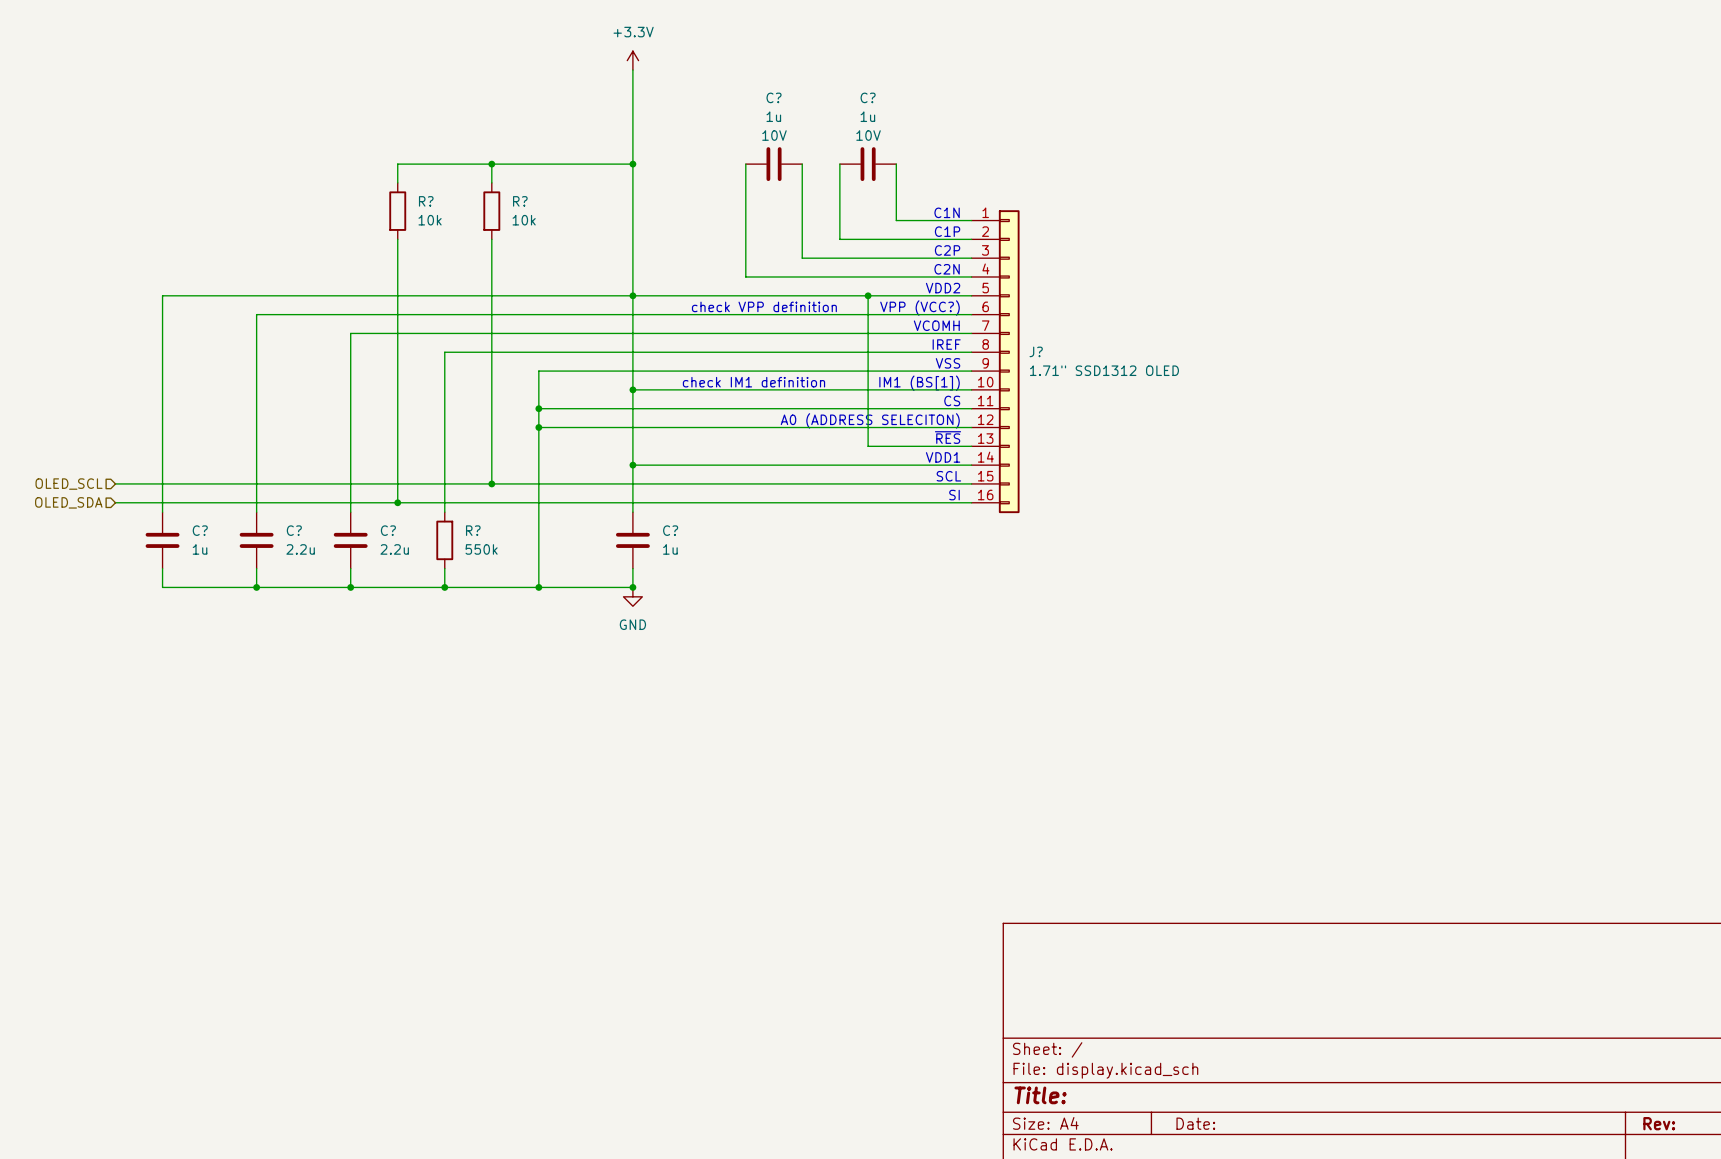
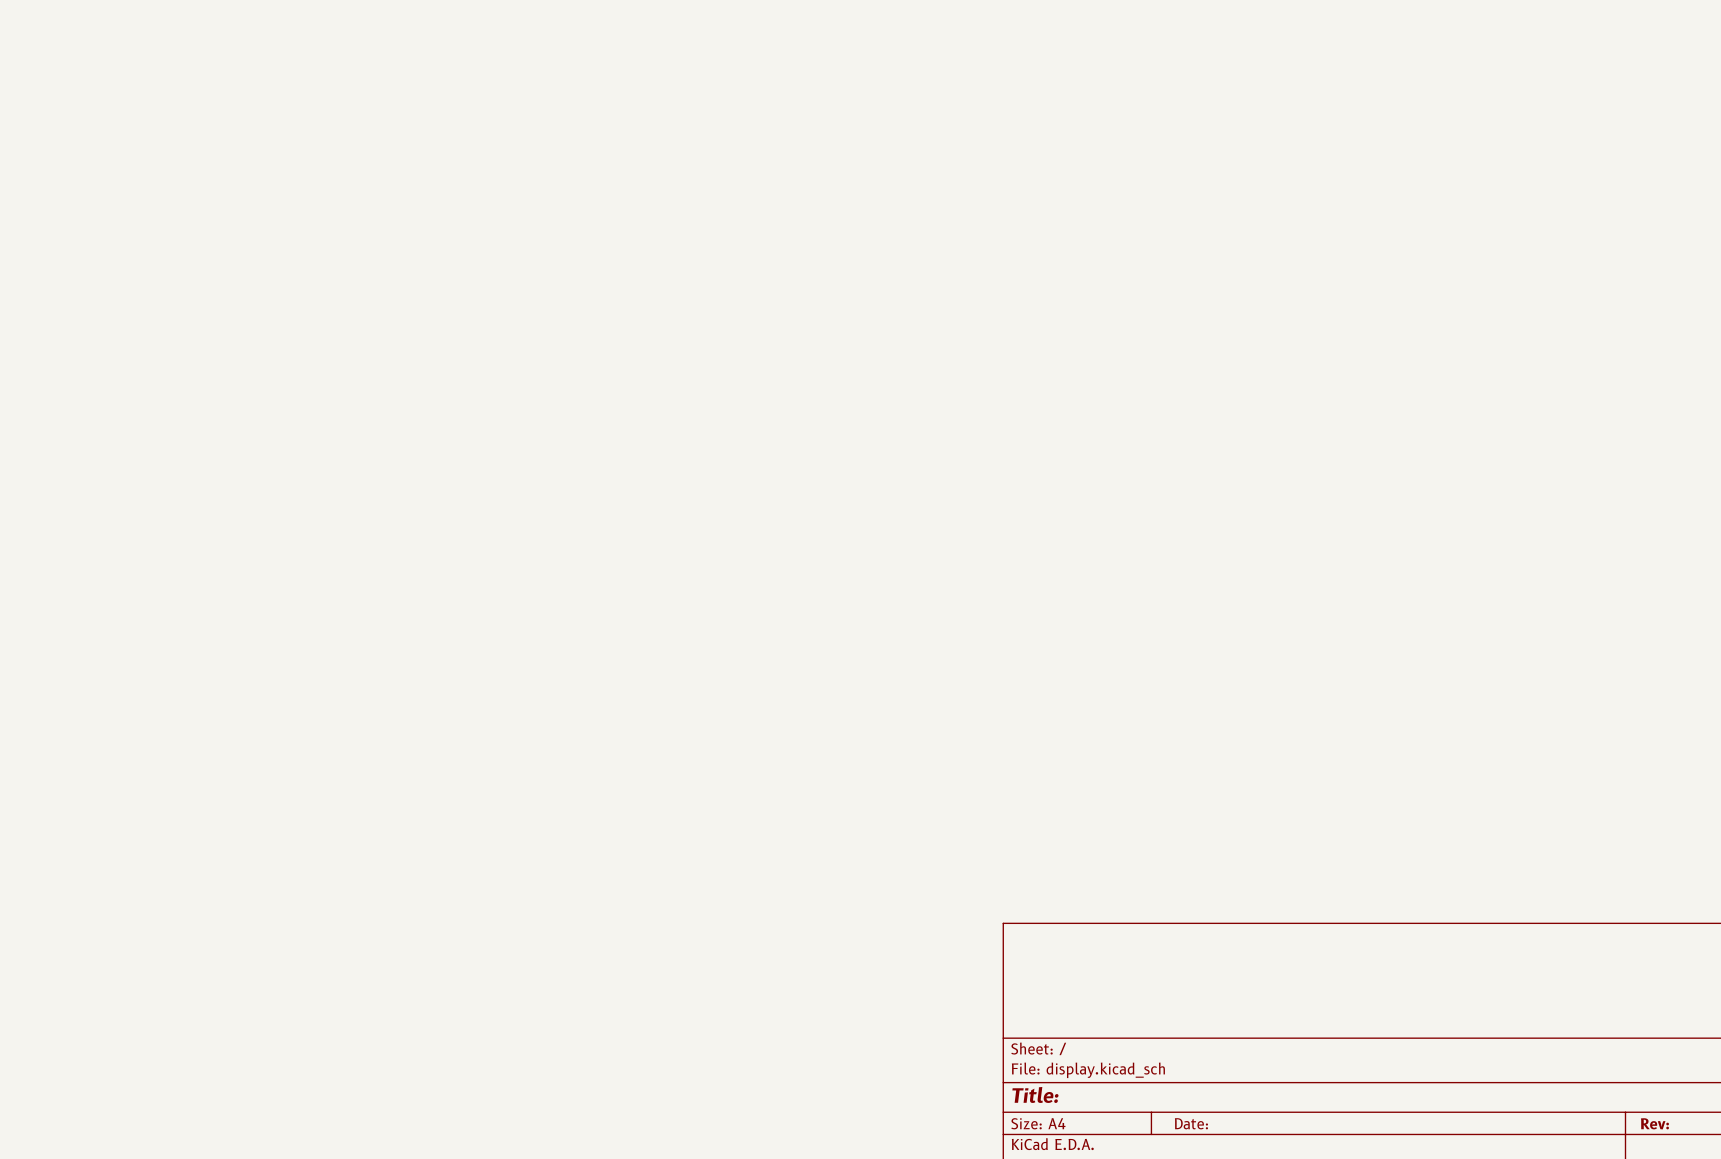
power symbol: +3.3V (632, 60) -> none
wire: (632, 70) (632, 512) -> none
wire: (491, 164) (491, 182) -> none
junction: (491, 164) -> none
wire: (632, 164) (397, 164) (397, 182) -> none
junction: (632, 164) -> none
wire: (745, 164) (745, 276) (971, 276) -> none
C?: 1u (774, 164) -> none
wire: (802, 164) (802, 258) (971, 258) -> none
wire: (839, 164) (839, 239) (971, 239) -> none
C?: 1u (868, 164) -> none
wire: (896, 164) (896, 220) (971, 220) -> none
R?: 10k (397, 211) -> none
R?: 10k (491, 211) -> none
text: C1N (947, 212) -> none
text: C1P (947, 231) -> none
wire: (397, 239) (397, 502) -> none
wire: (491, 239) (491, 483) -> none
text: C2P (947, 250) -> none
text: C2N (947, 269) -> none
text: VDD2 (943, 288) -> none
junction: (632, 295) -> none
wire: (868, 295) (868, 446) (971, 446) -> none
junction: (868, 295) -> none
wire: (971, 295) (162, 295) (162, 512) -> none
text: check VPP definition (764, 306) -> none
text: VPP (VCC?) (919, 308) -> none
wire: (971, 314) (256, 314) (256, 512) -> none
text: VCOMH (936, 325) -> none
wire: (971, 333) (350, 333) (350, 512) -> none
text: IREF (946, 344) -> none
wire: (971, 352) (444, 352) (444, 512) -> none
J?: 1.71" SSD1312 OLED (995, 361) -> none
text: VSS (947, 363) -> none
wire: (971, 371) (538, 371) (538, 587) -> none
text: check IM1 definition (753, 382) -> none
text: IM1 (BS[1]) (919, 383) -> none
wire: (632, 389) (971, 389) -> none
junction: (632, 389) -> none
text: CS (952, 400) -> none
wire: (538, 408) (971, 408) -> none
junction: (538, 408) -> none
text: A0 (ADDRESS SELECITON) (870, 420) -> none
wire: (538, 427) (971, 427) -> none
junction: (538, 427) -> none
text: ~{RES} (947, 437) -> none
text: VDD1 (943, 457) -> none
wire: (632, 465) (971, 465) -> none
junction: (632, 465) -> none
text: SCL (948, 476) -> none
wire: (115, 483) (971, 483) -> none
junction: (491, 483) -> none
hierarchical label: OLED_SCL (69, 484) -> none
text: SI (954, 495) -> none
hierarchical label: OLED_SDA (68, 502) -> none
wire: (115, 502) (971, 502) -> none
junction: (397, 502) -> none
C?: 1u (162, 540) -> none
C?: 2.2u (256, 540) -> none
C?: 2.2u (350, 540) -> none
R?: 550k (444, 540) -> none
C?: 1u (632, 540) -> none
wire: (162, 568) (162, 587) (632, 587) (632, 568) -> none
wire: (256, 568) (256, 587) -> none
wire: (350, 568) (350, 587) -> none
wire: (444, 568) (444, 587) -> none
junction: (256, 587) -> none
junction: (350, 587) -> none
junction: (444, 587) -> none
junction: (538, 587) -> none
junction: (632, 587) -> none
power symbol: GND (632, 596) -> none

